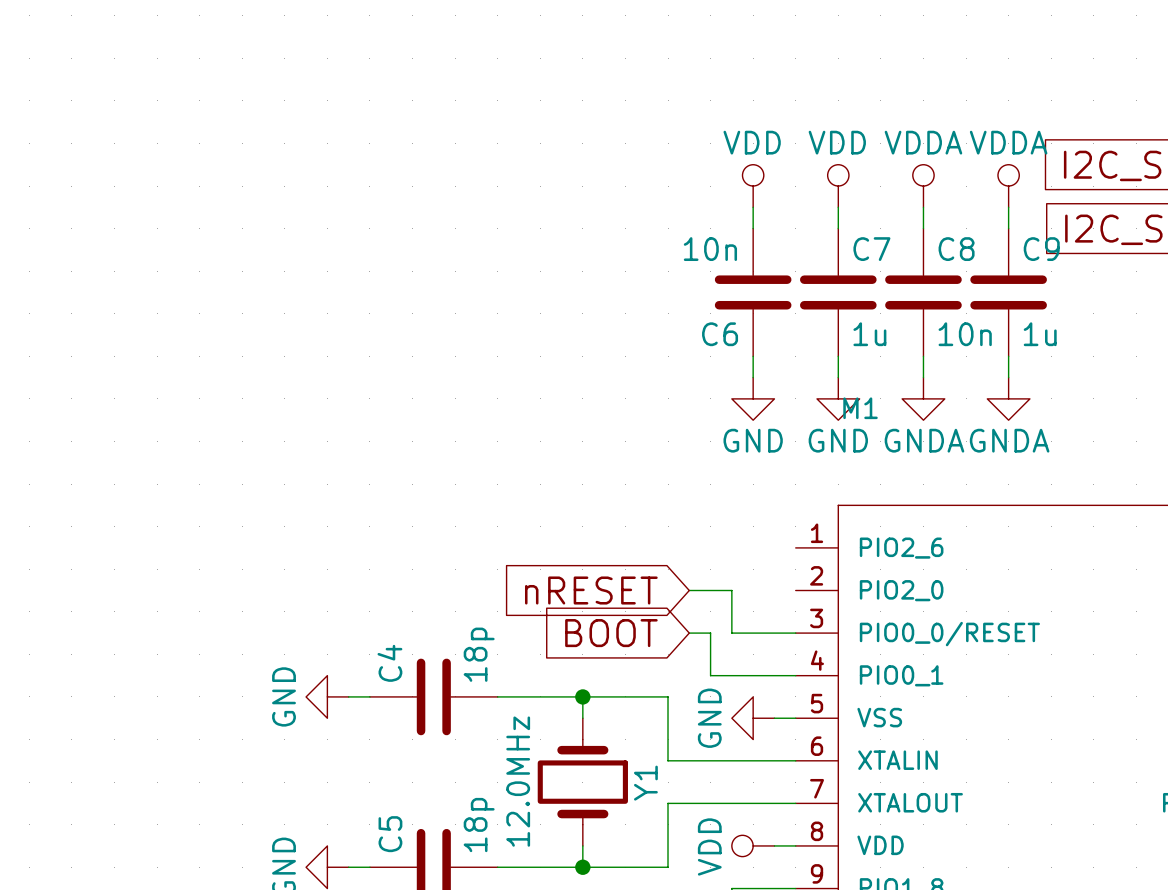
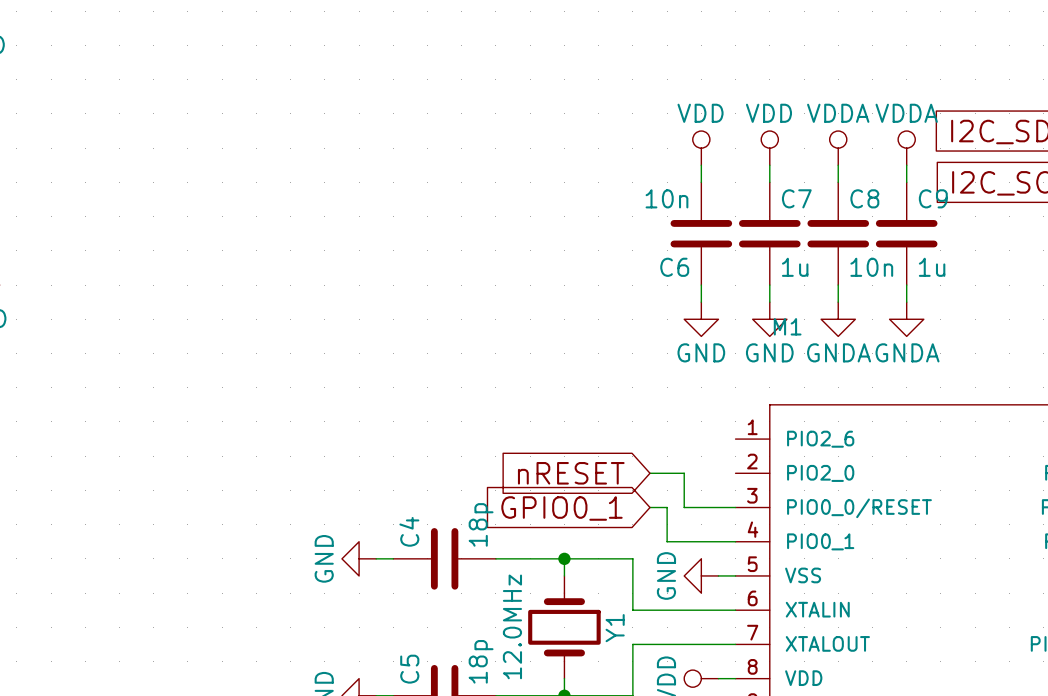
global label: BOOT (611, 633) -> GPIO0_1 (561, 508)

